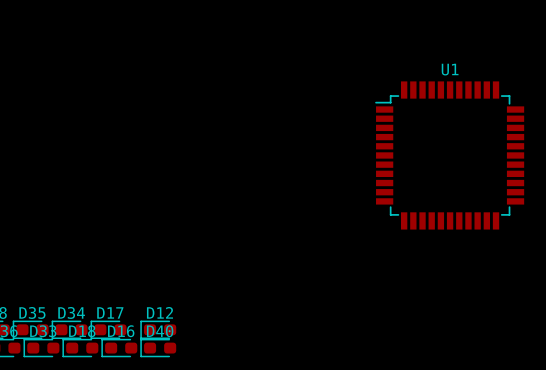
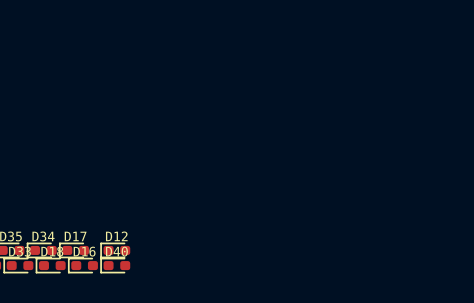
U1: (449, 155) -> none

